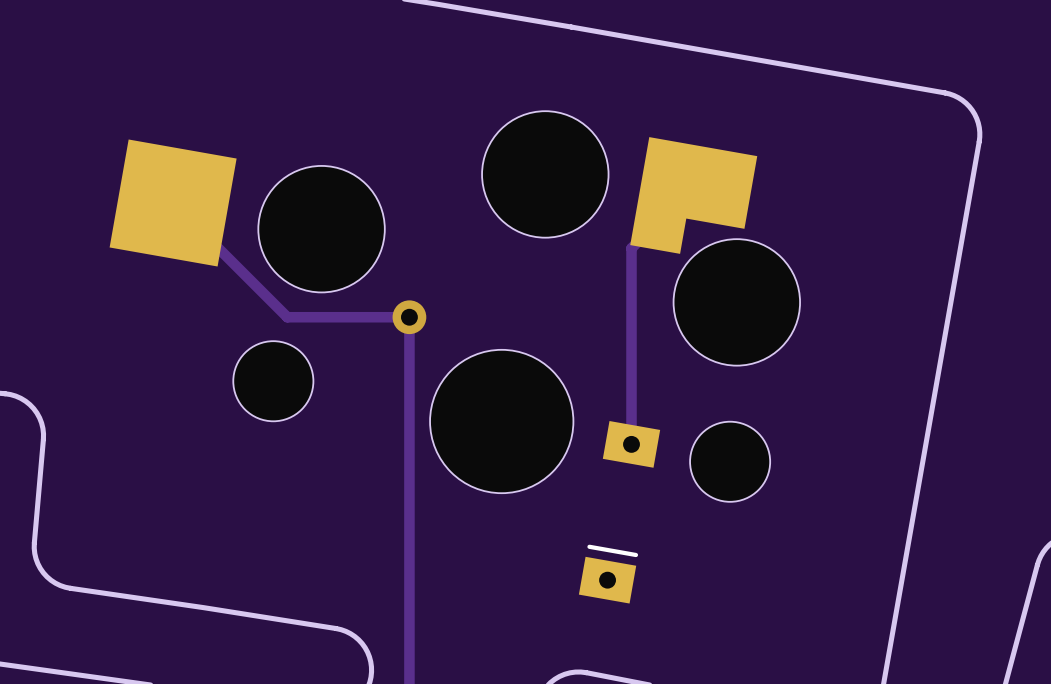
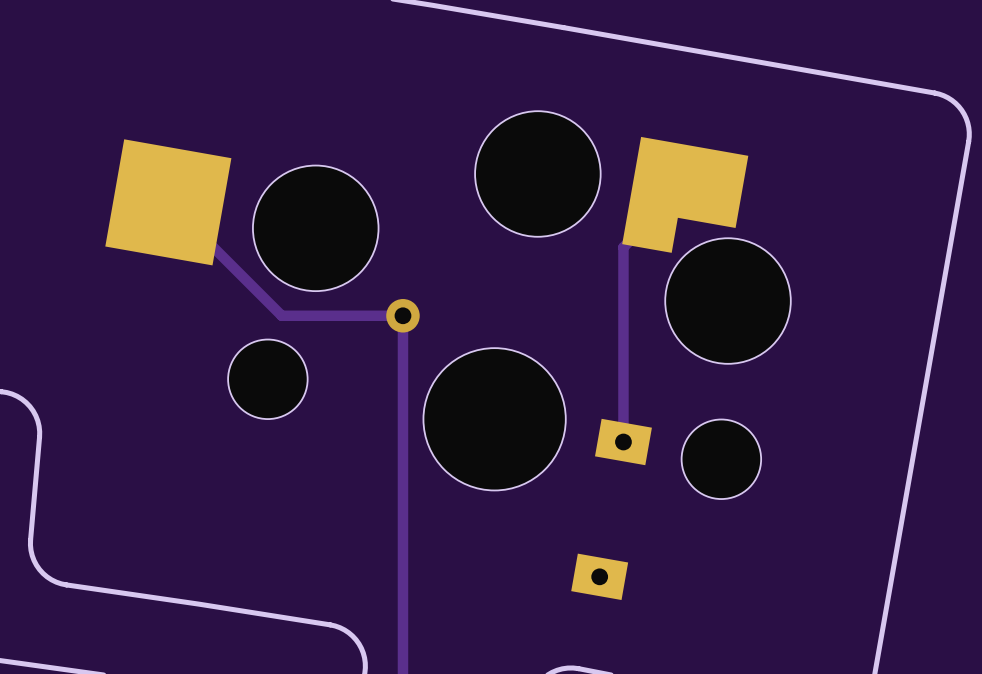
part footprint: [109, 111, 801, 604] -> [105, 111, 791, 601]

